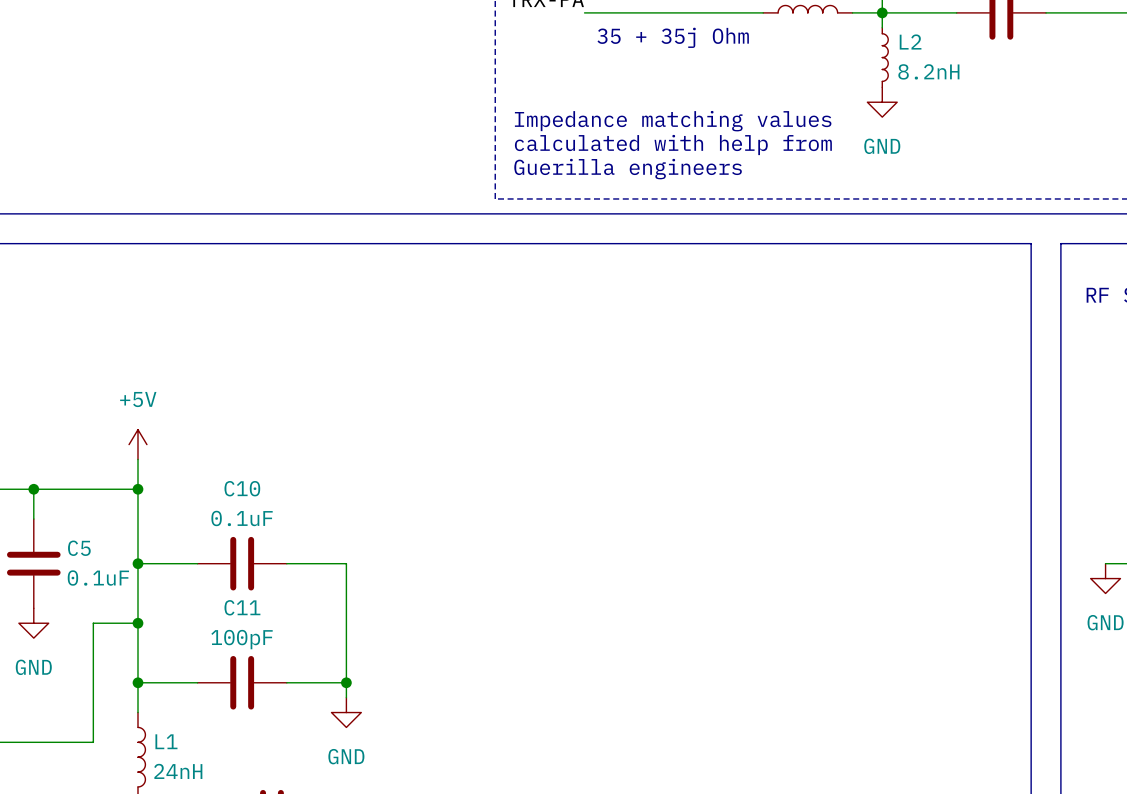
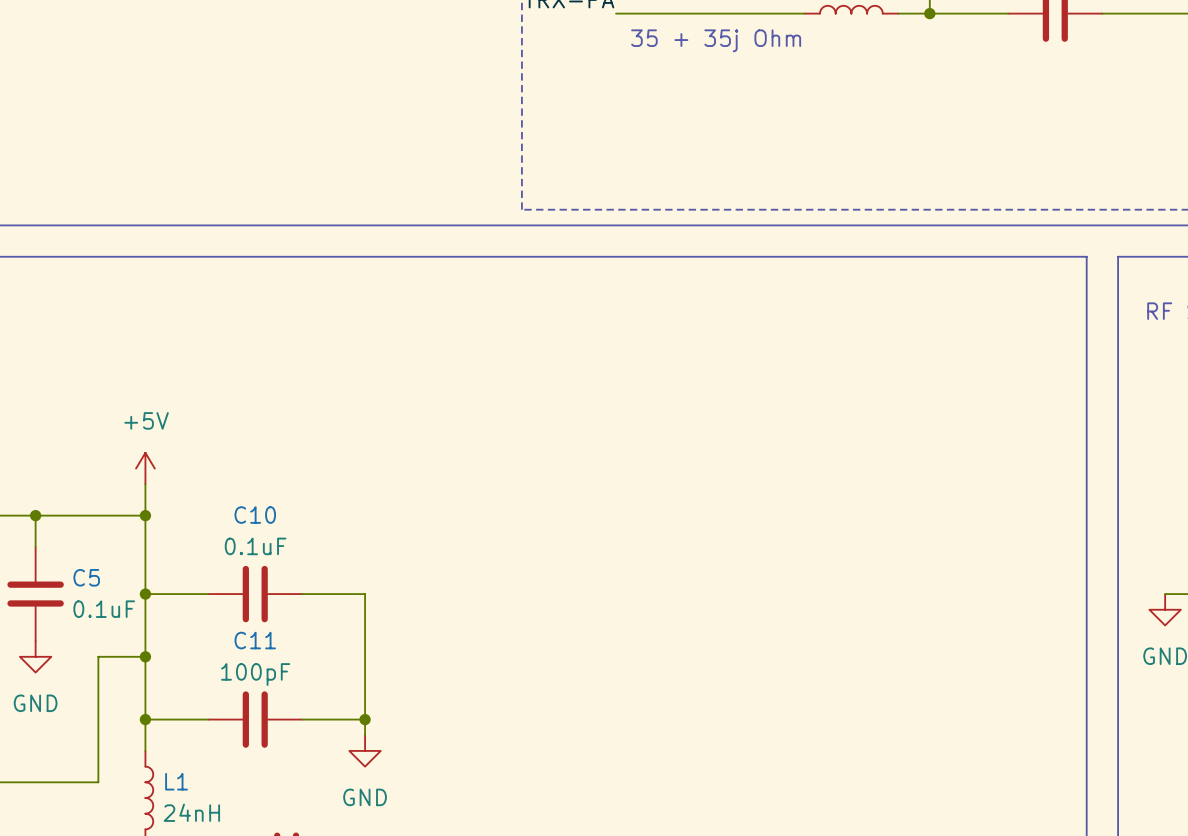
wire: (882, 12) (882, 27) -> none
L2: 8.2nH (885, 57) -> none
power symbol: GND (882, 102) -> none
text: Impedance matching values (673, 121) -> none
text: calculated with help from (673, 145) -> none
text: Guerilla engineers (628, 169) -> none

